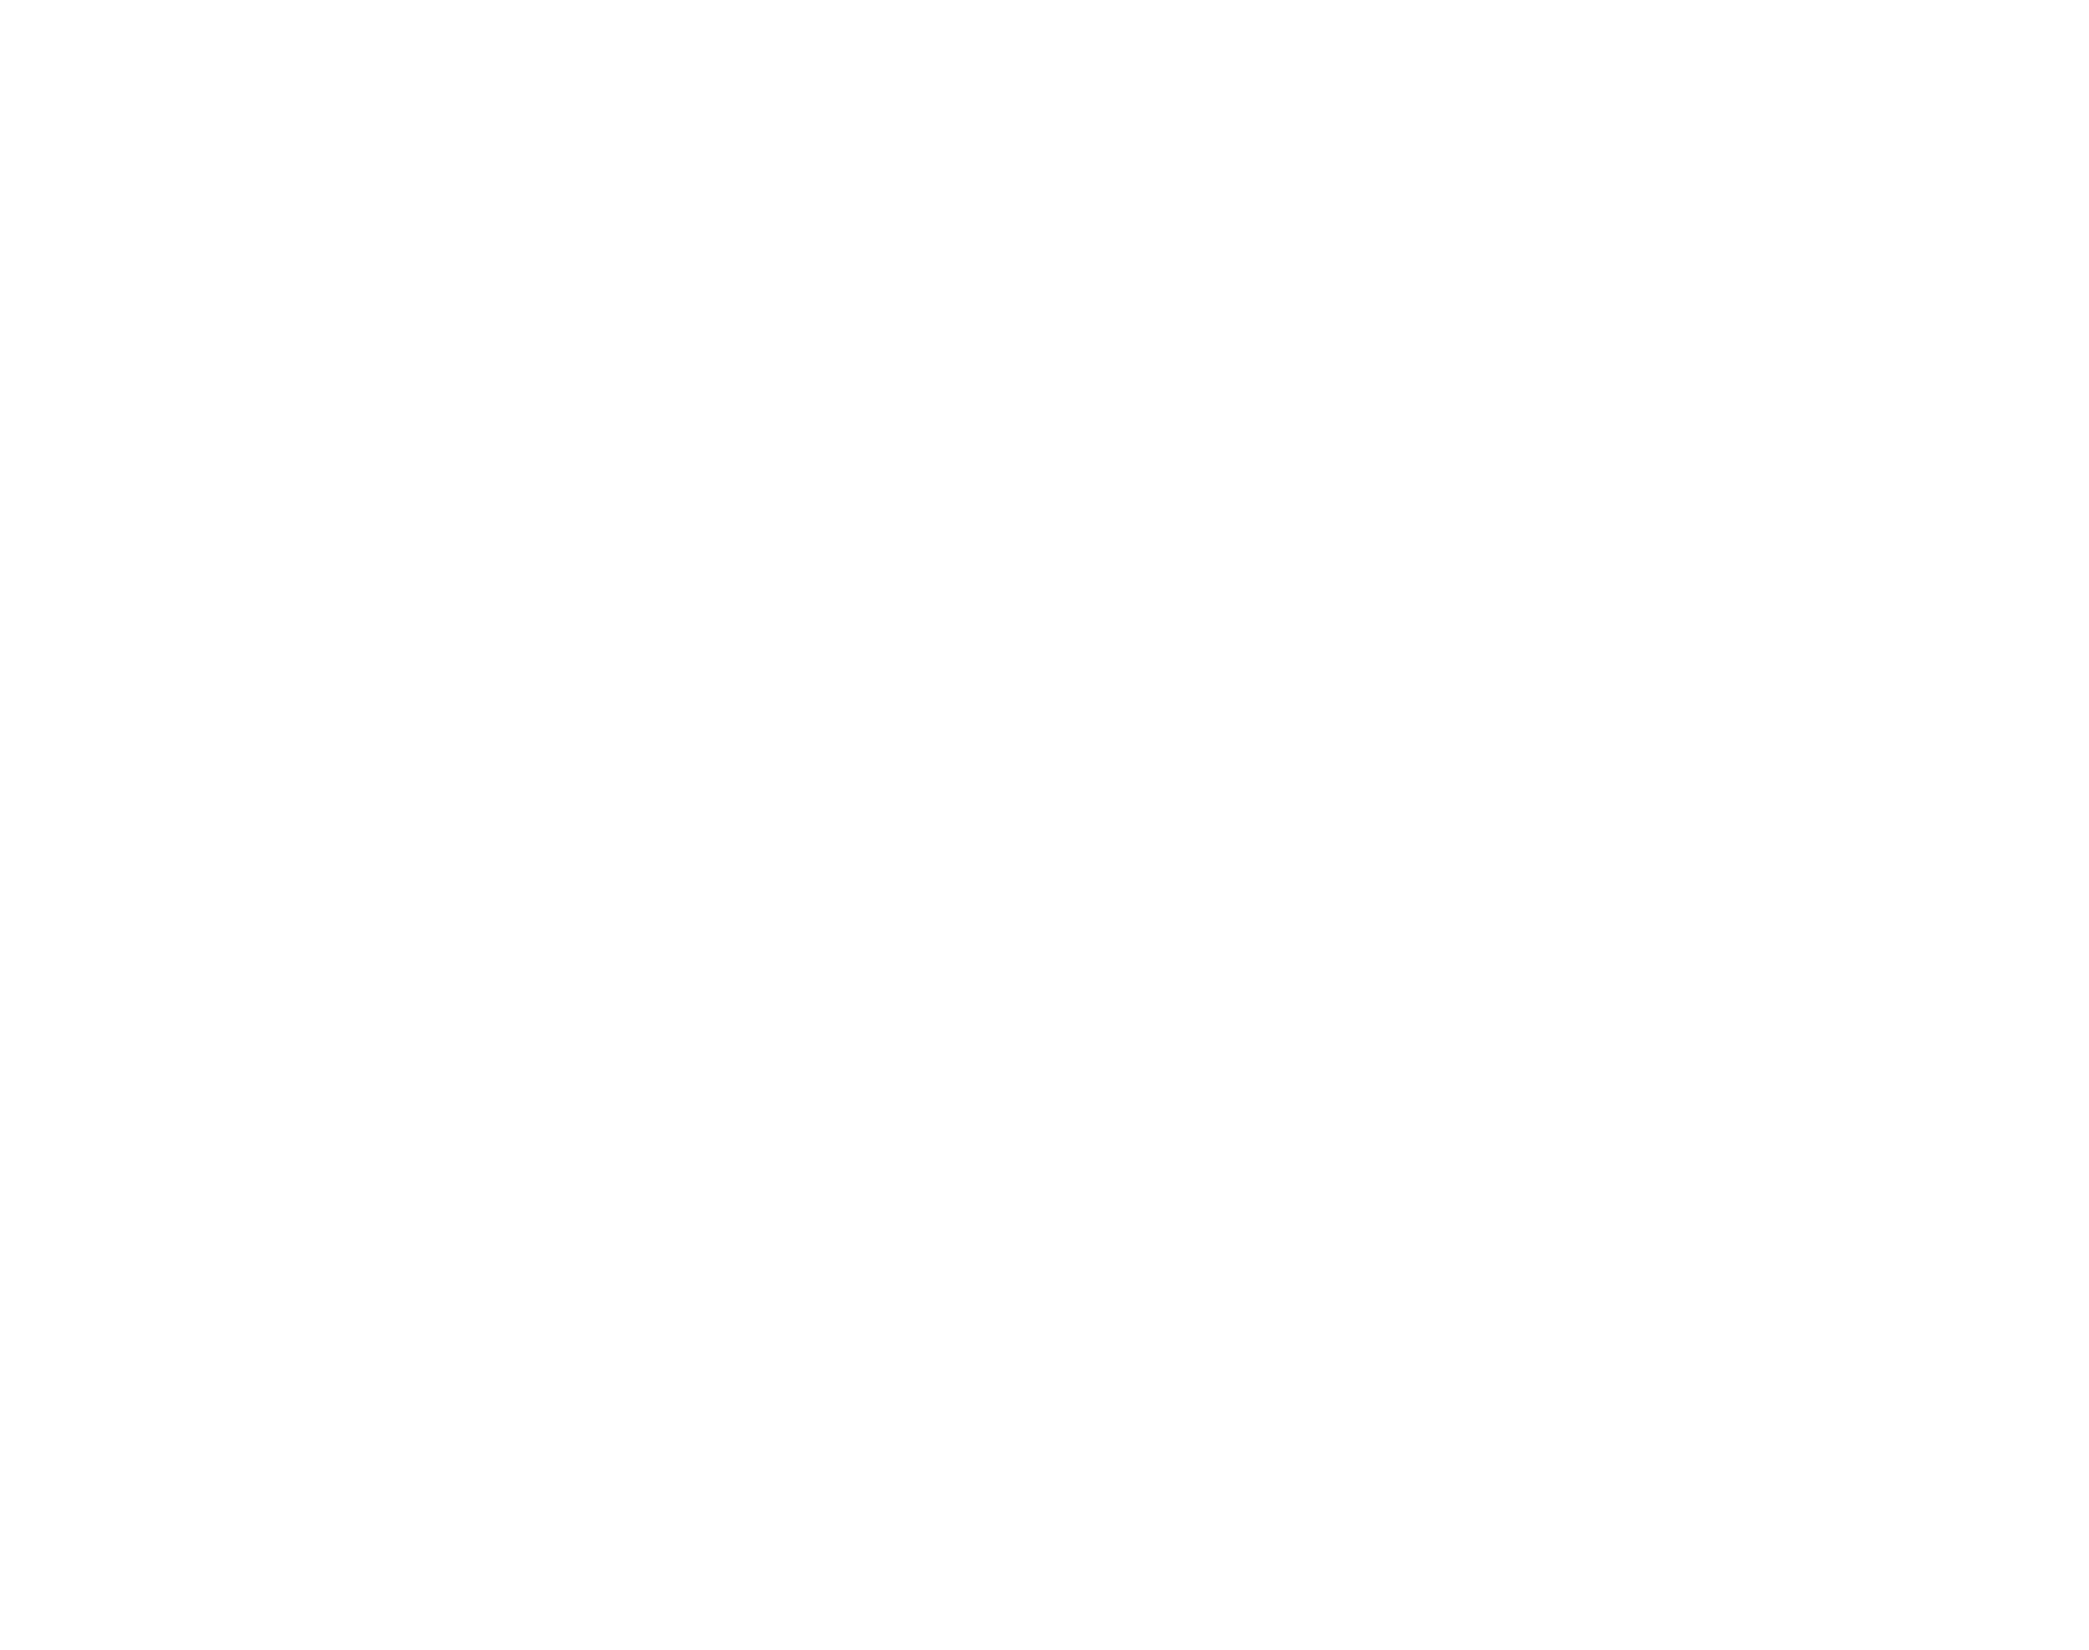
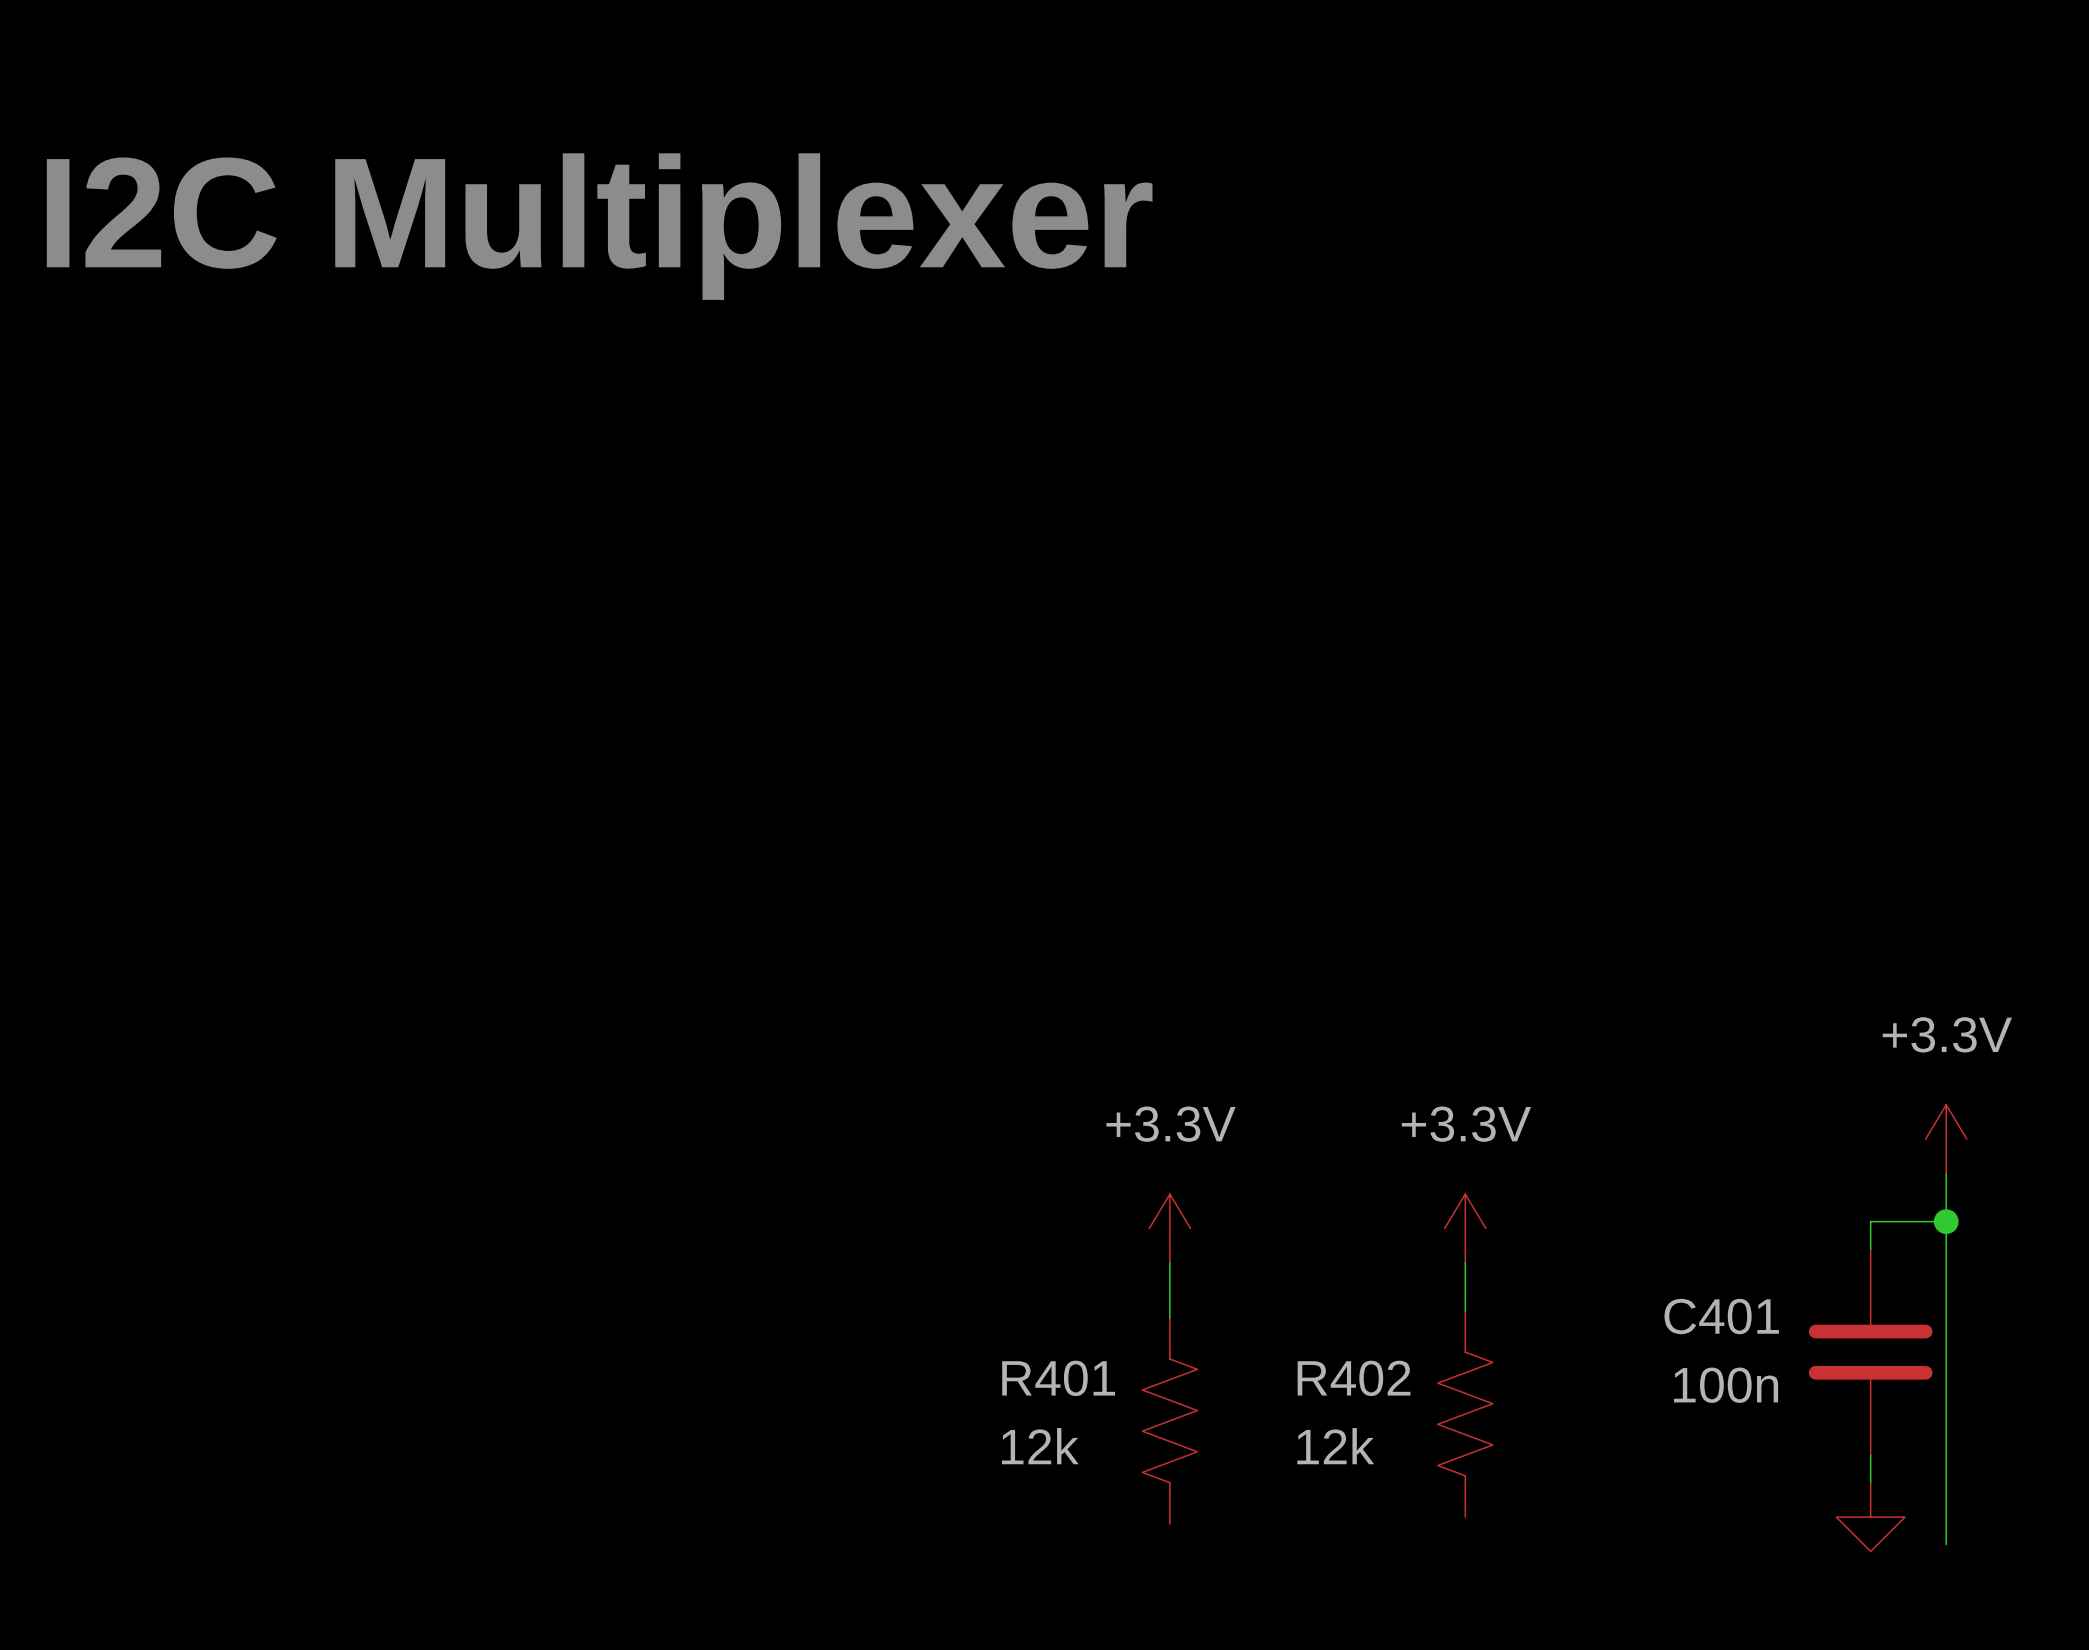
text: none -> I2C Multiplexer (599, 226)
power symbol: none -> +3.3V (1946, 1139)
wire: none -> (1946, 1173) (1946, 1544)
wire: none -> (1946, 1221) (1870, 1221) (1870, 1249)
junction: none -> (1946, 1221)
power symbol: none -> +3.3V (1169, 1228)
power symbol: none -> +3.3V (1465, 1228)
wire: none -> (1169, 1262) (1169, 1317)
wire: none -> (1465, 1262) (1465, 1310)
C401: none -> 100n (1870, 1352)
R402: none -> 12k (1465, 1414)
R401: none -> 12k (1169, 1420)
wire: none -> (1870, 1455) (1870, 1482)
power symbol: none -> (1870, 1517)

